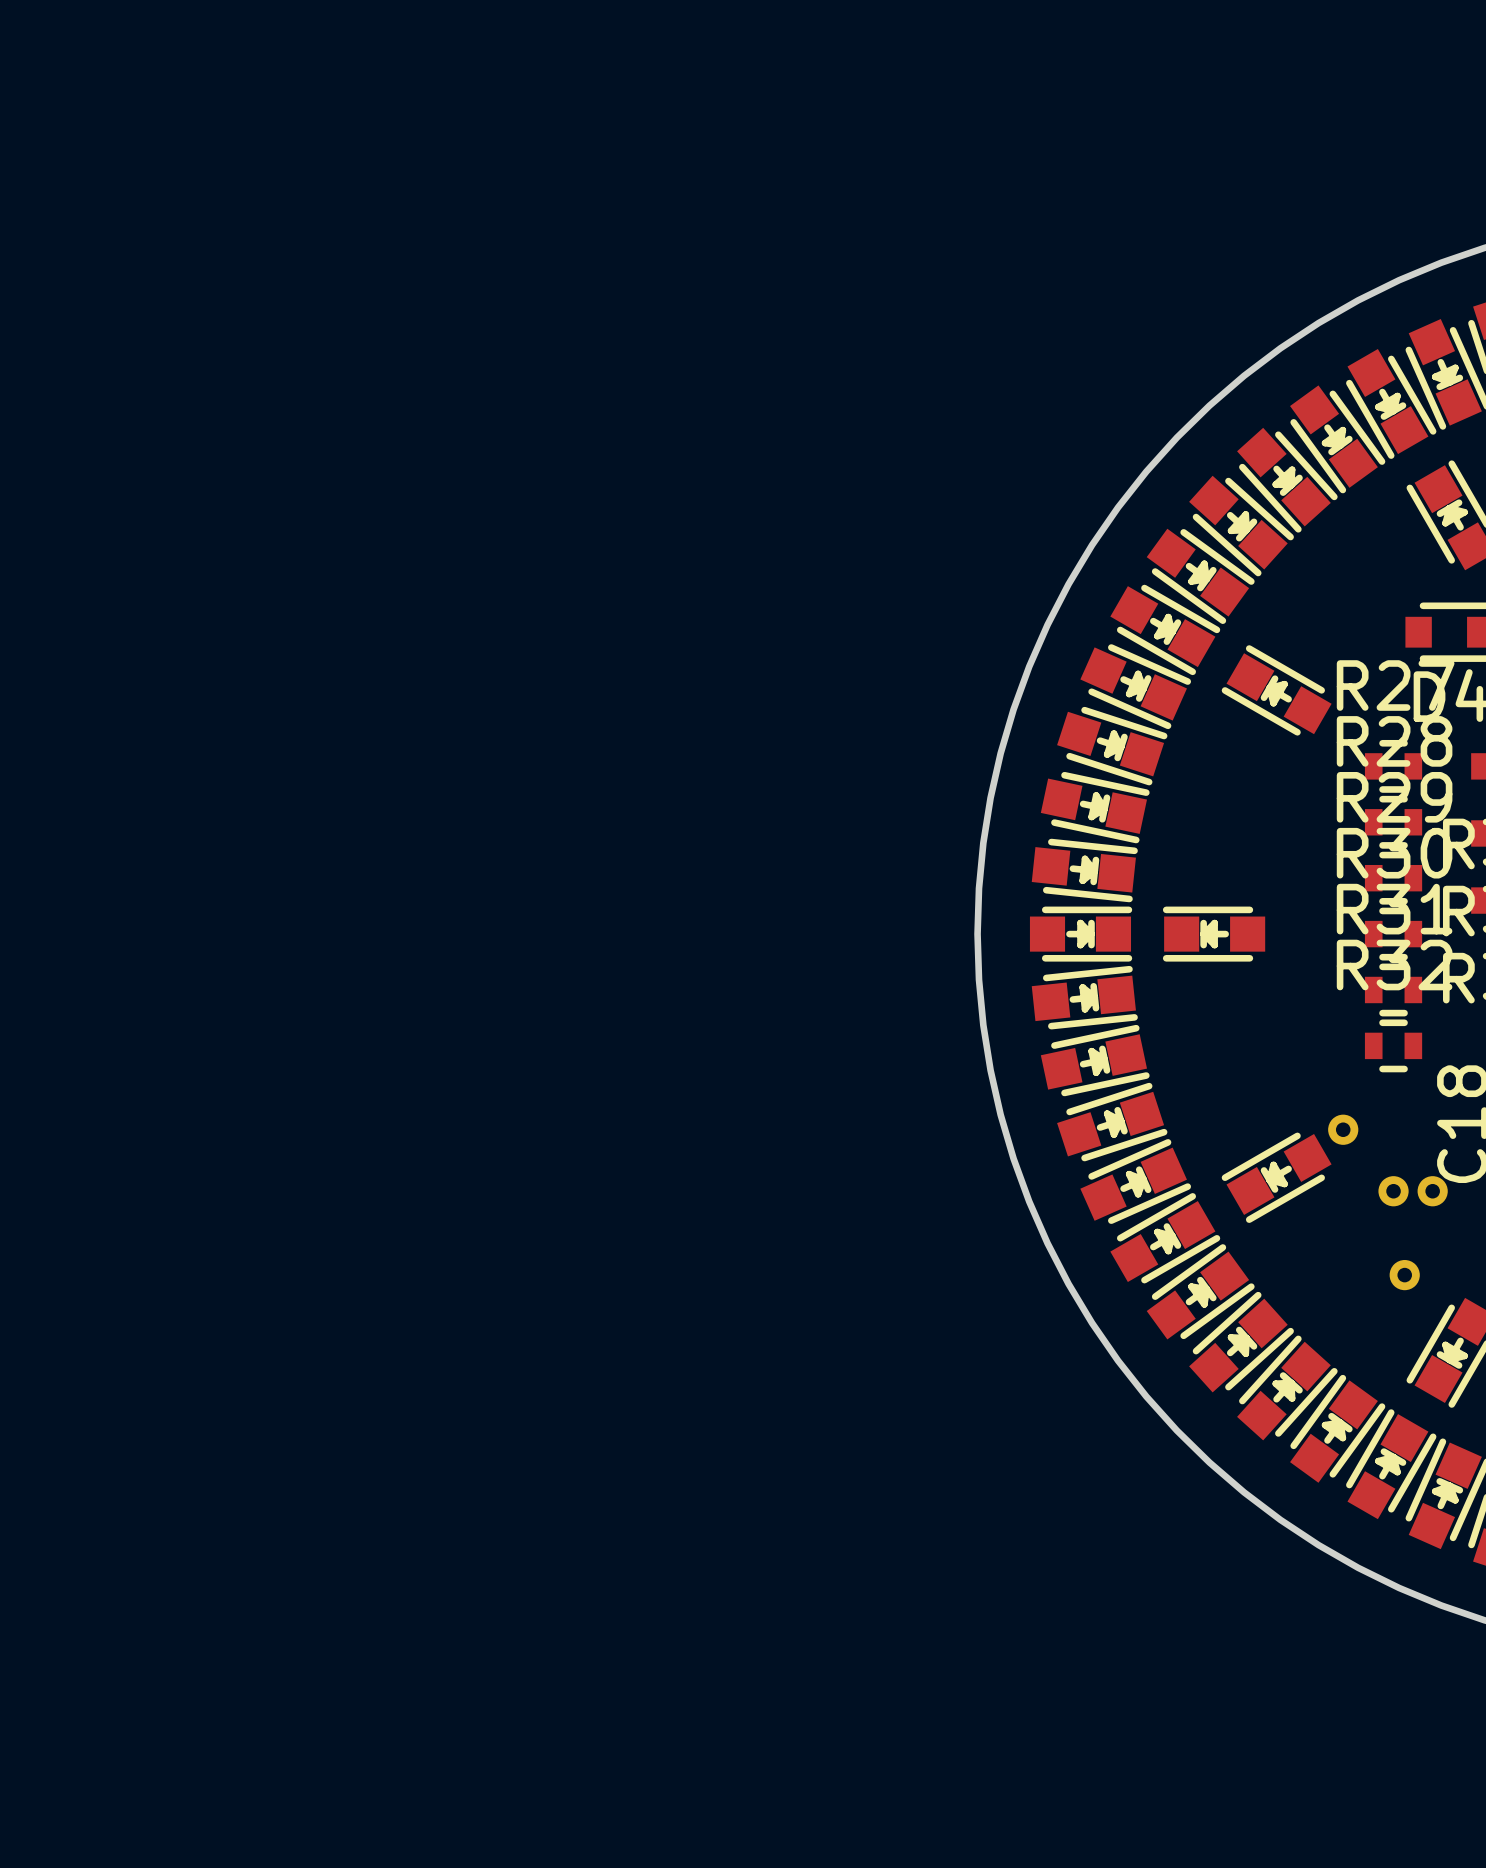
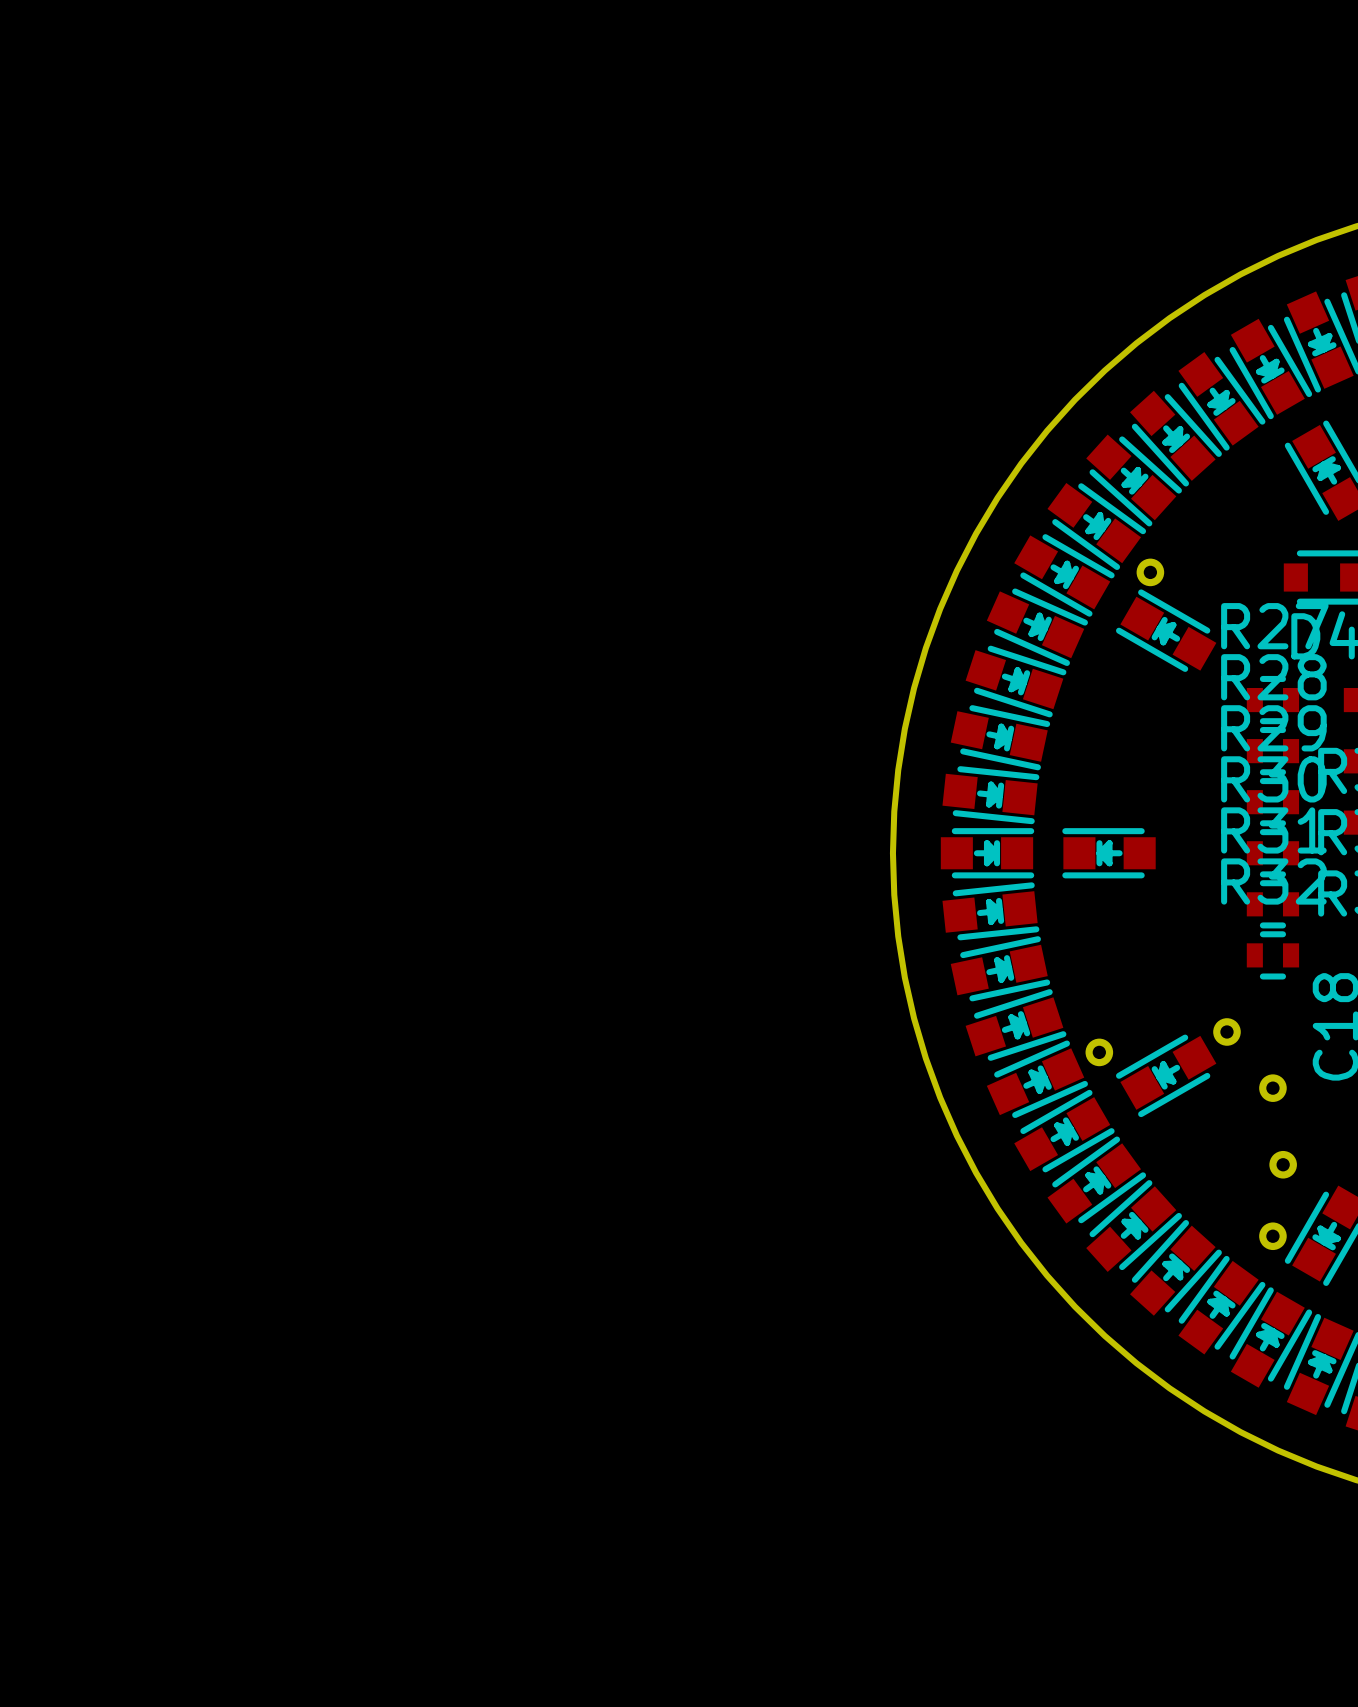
part: none -> (1150, 572)
part: none -> (1099, 1052)
part: (1432, 1191) -> none
part: none -> (1272, 1236)

